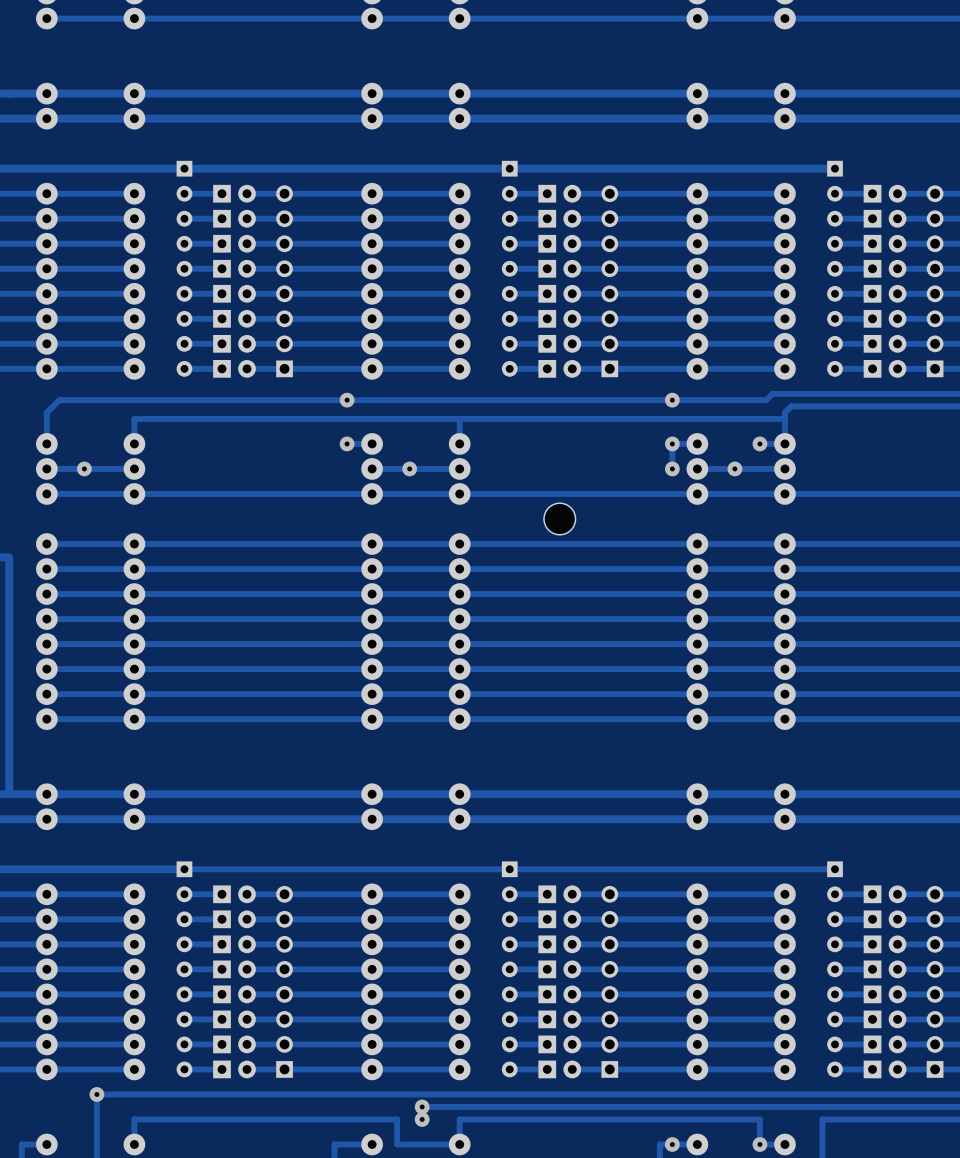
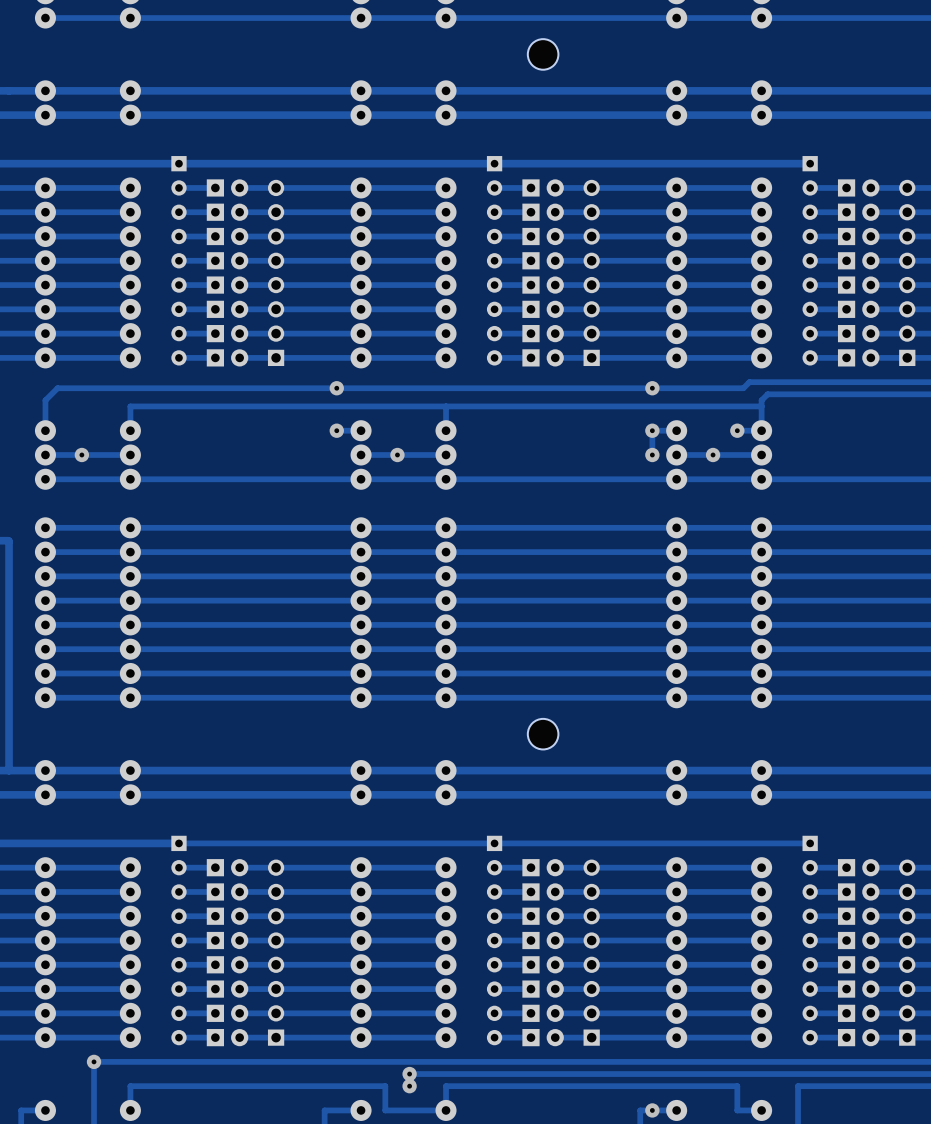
part: none -> (543, 54)
part: (559, 518) -> none
part: none -> (543, 734)
via: (759, 1144) -> none

